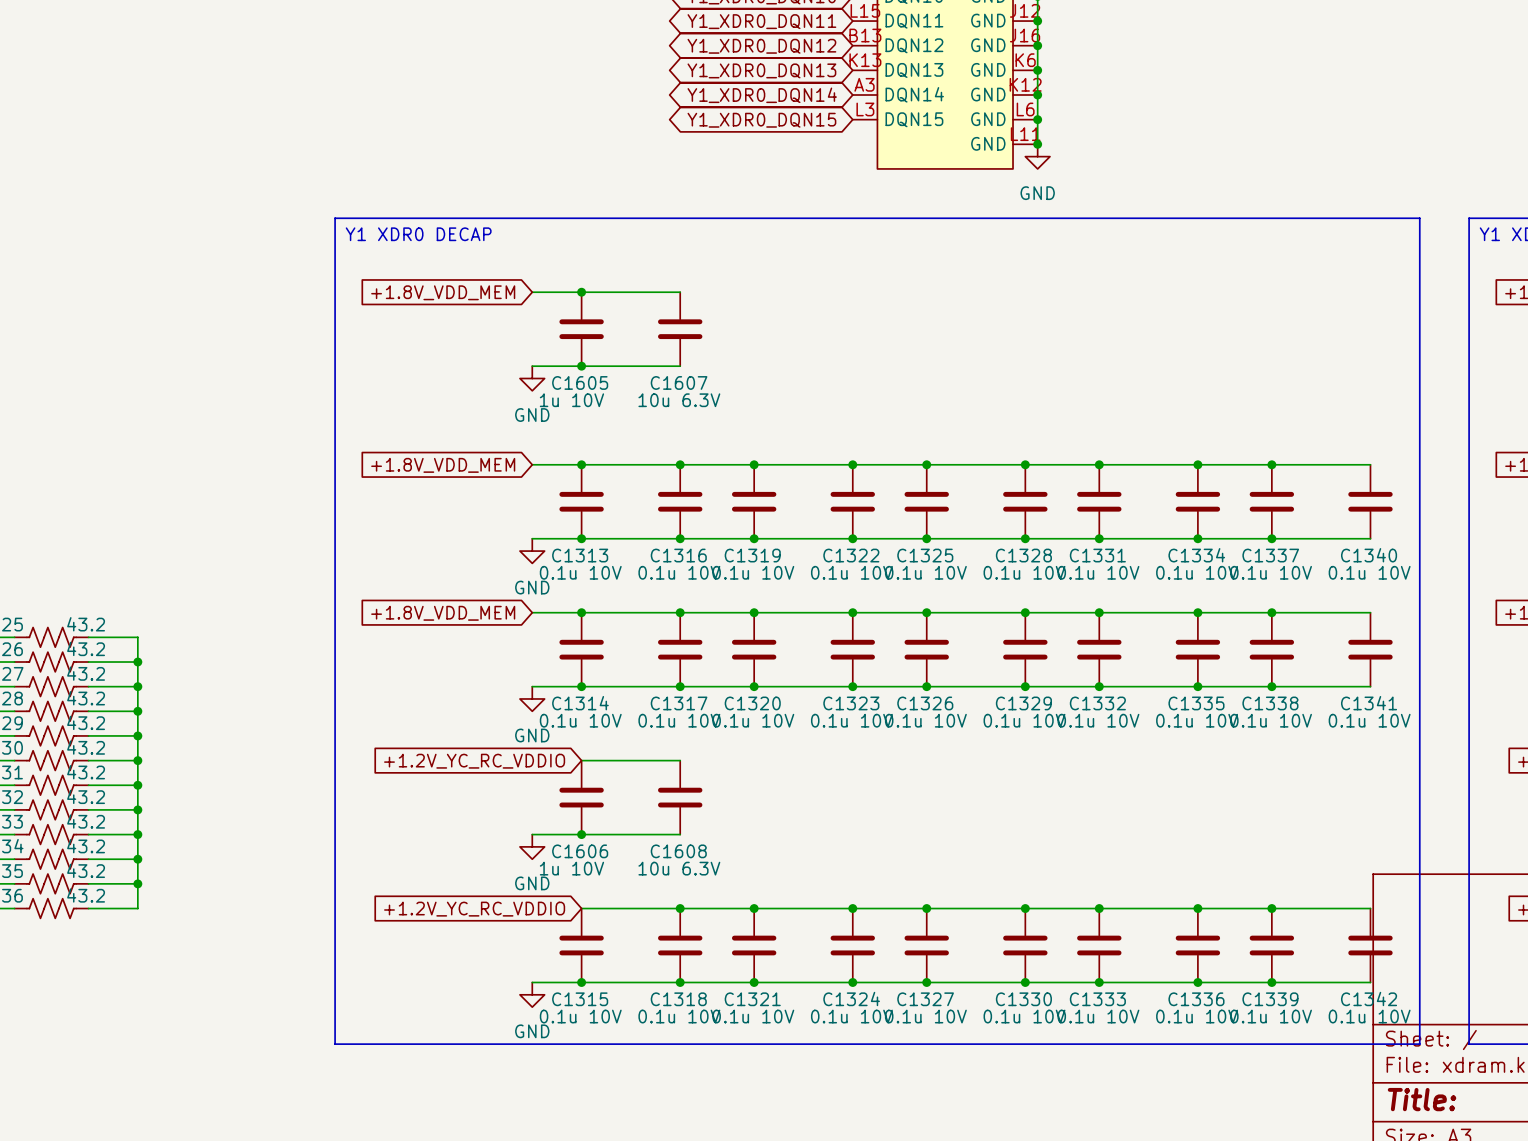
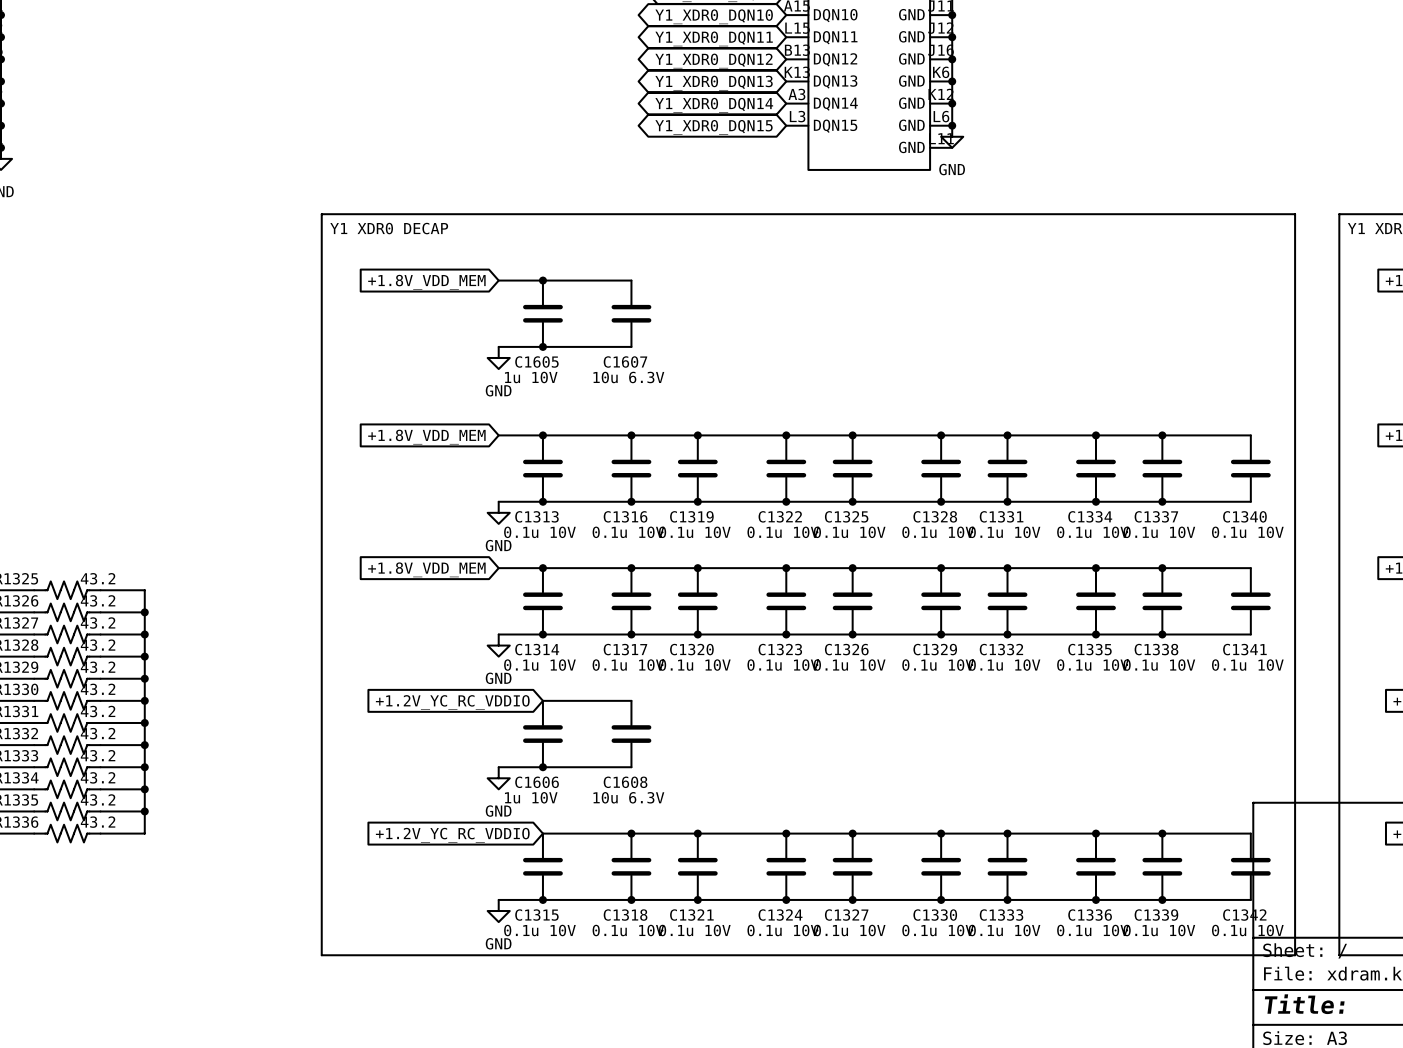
junction: (1037, 144) -> none
power symbol position: GND (1037, 156) -> GND (952, 136)

